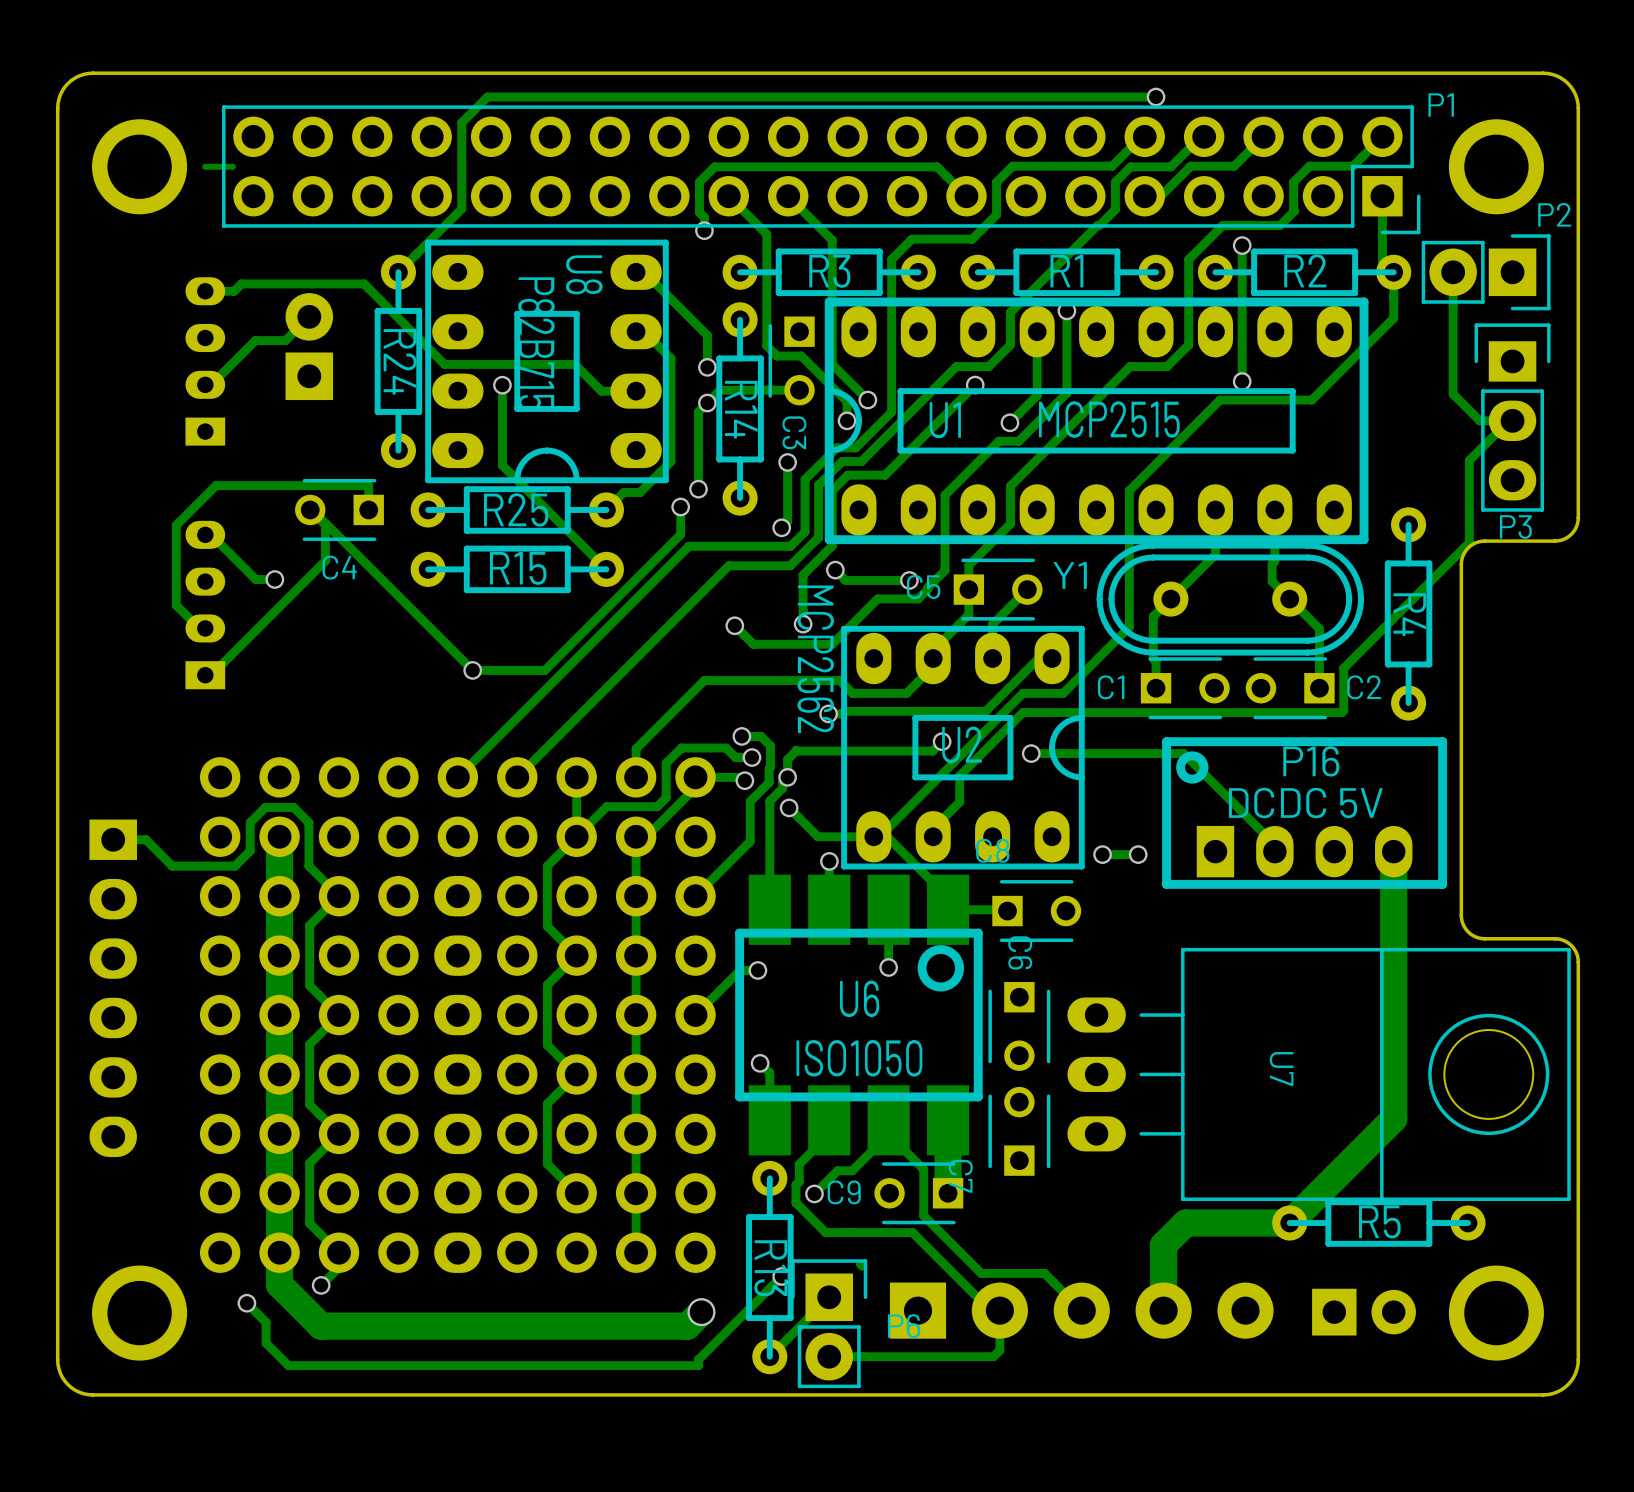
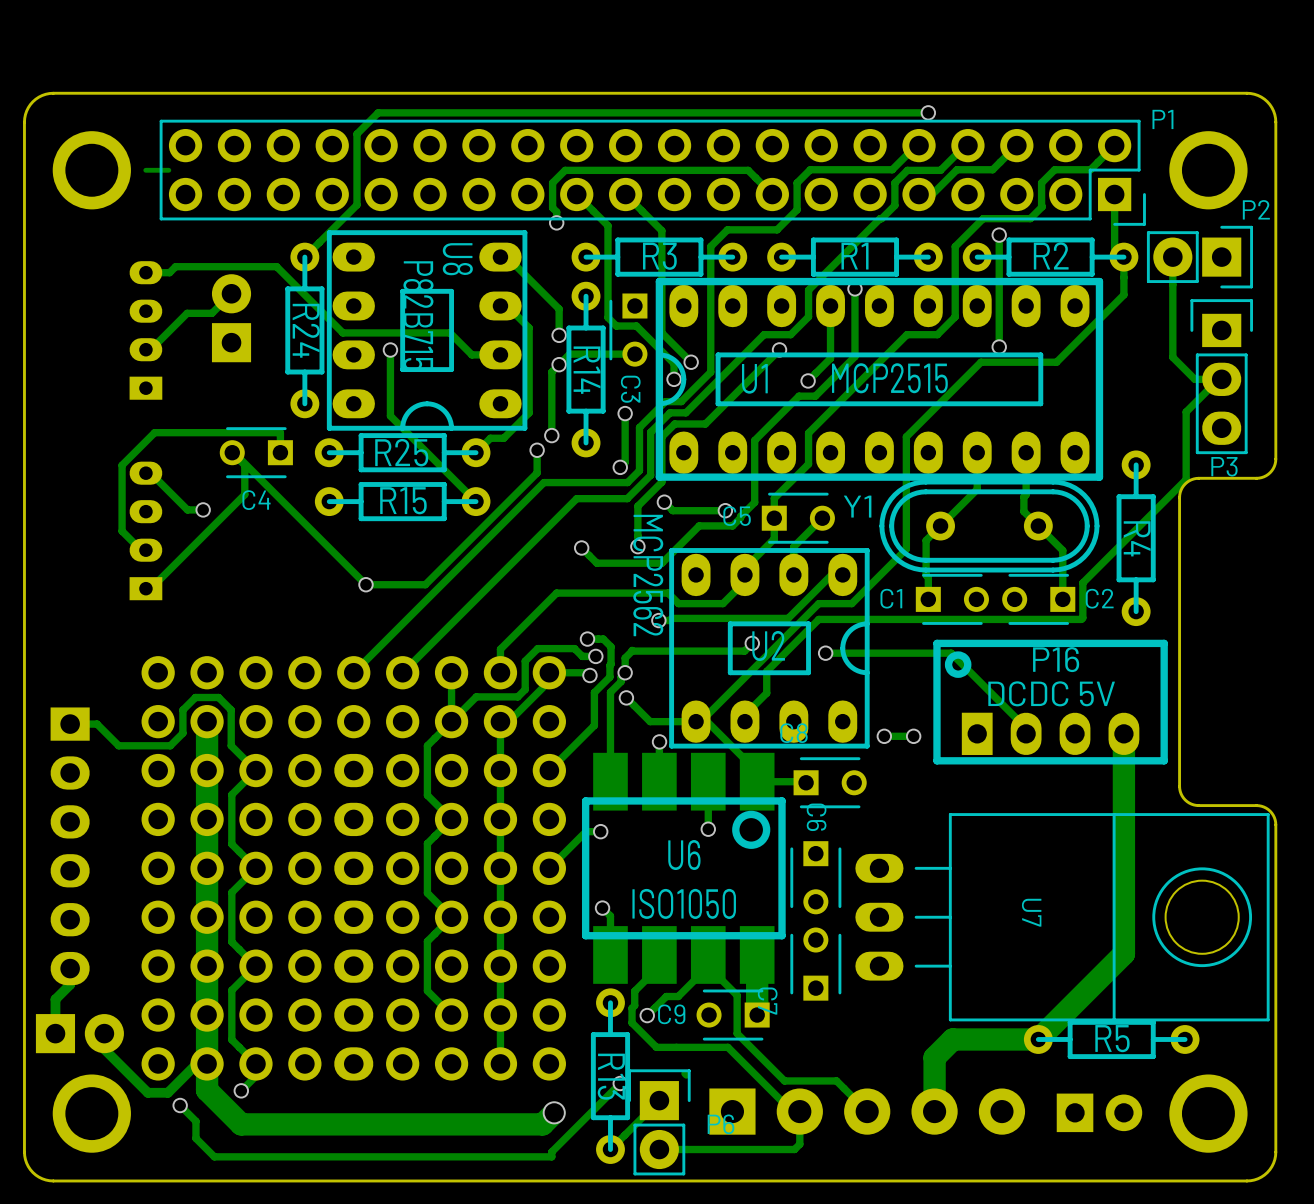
track: none -> (70, 968) (70, 984) (55, 999) (55, 1033)
part: none -> (79, 1033)
track: none -> (104, 1033) (104, 1049) (147, 1092) (167, 1092) (196, 1063) (207, 1063)

